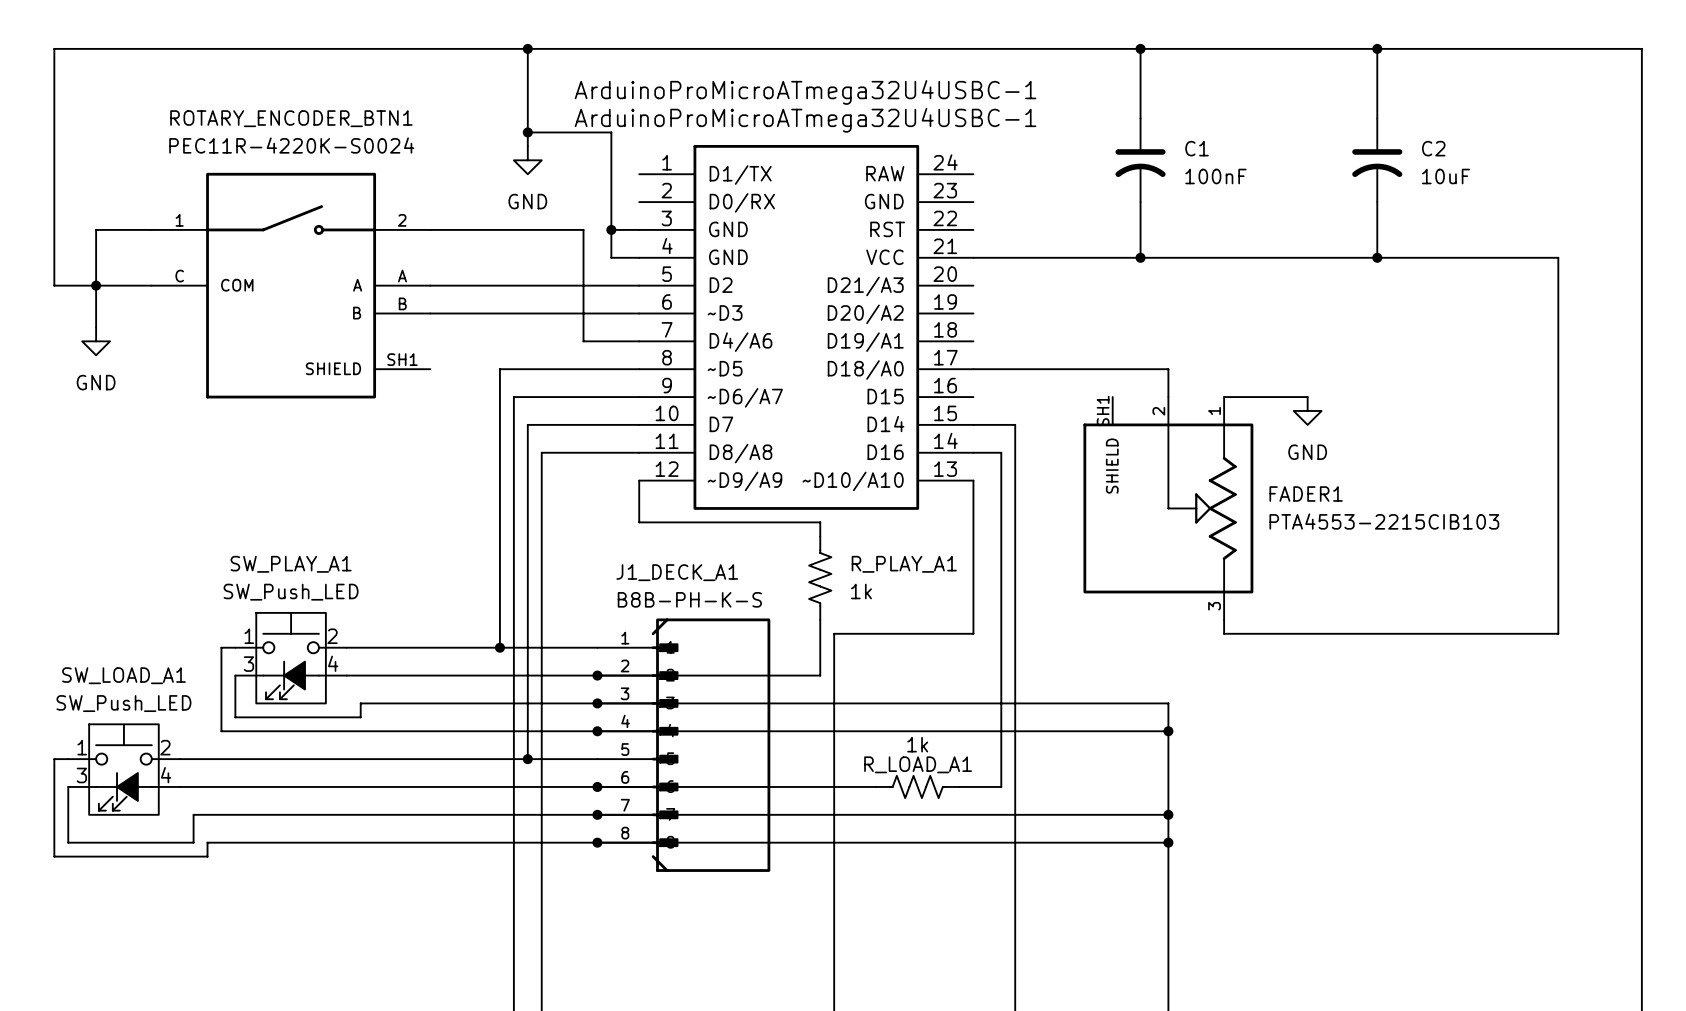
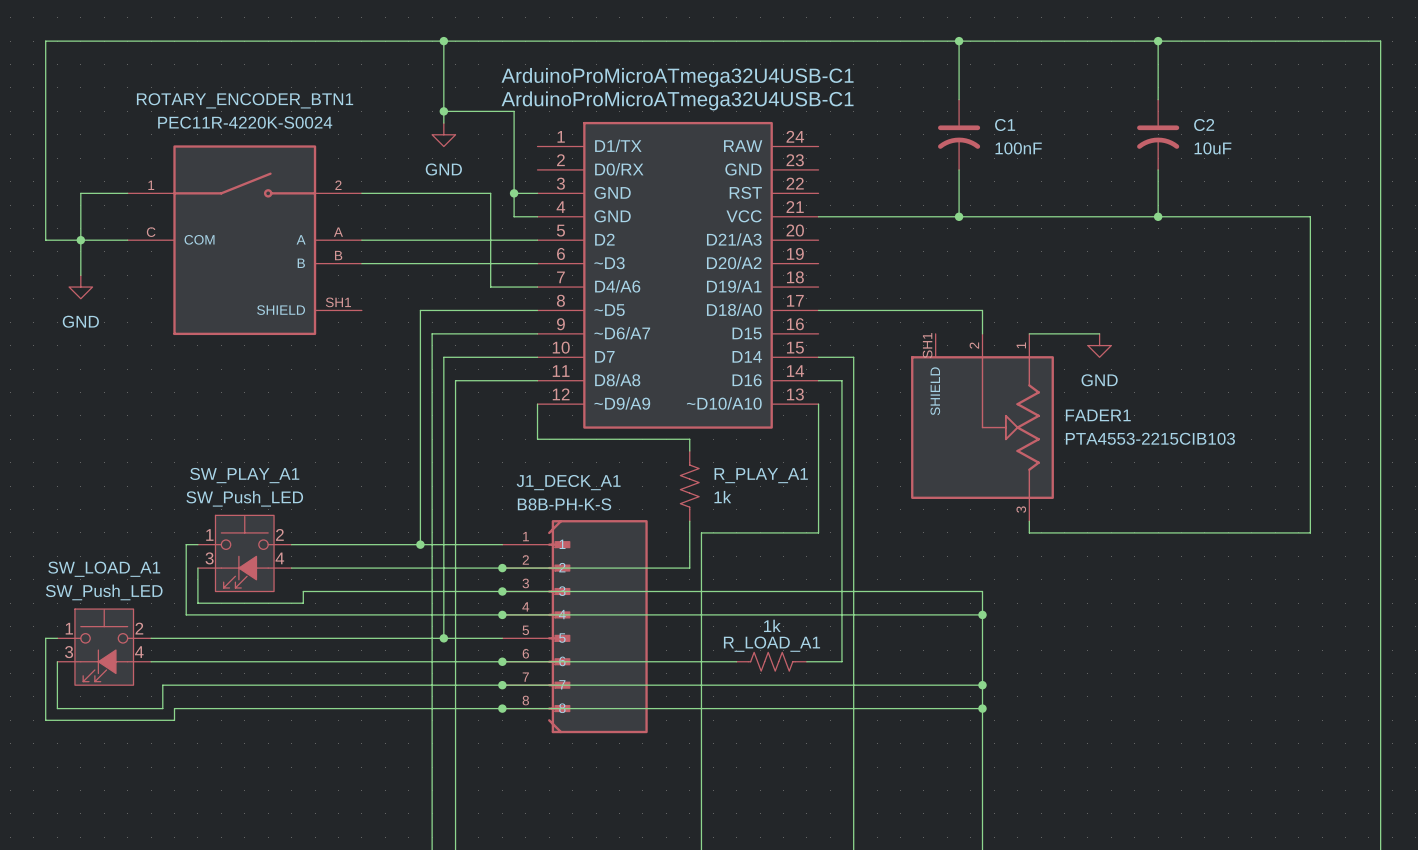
ArduinoProMicroATmega32U4USBC-1 name: ArduinoProMicroATmega32U4USBC-1 (805, 92) -> ArduinoProMicroATmega32U4USB-C1 (677, 77)
ArduinoProMicroATmega32U4USBC-1 value: ArduinoProMicroATmega32U4USBC-1 (805, 120) -> ArduinoProMicroATmega32U4USB-C1 (677, 100)

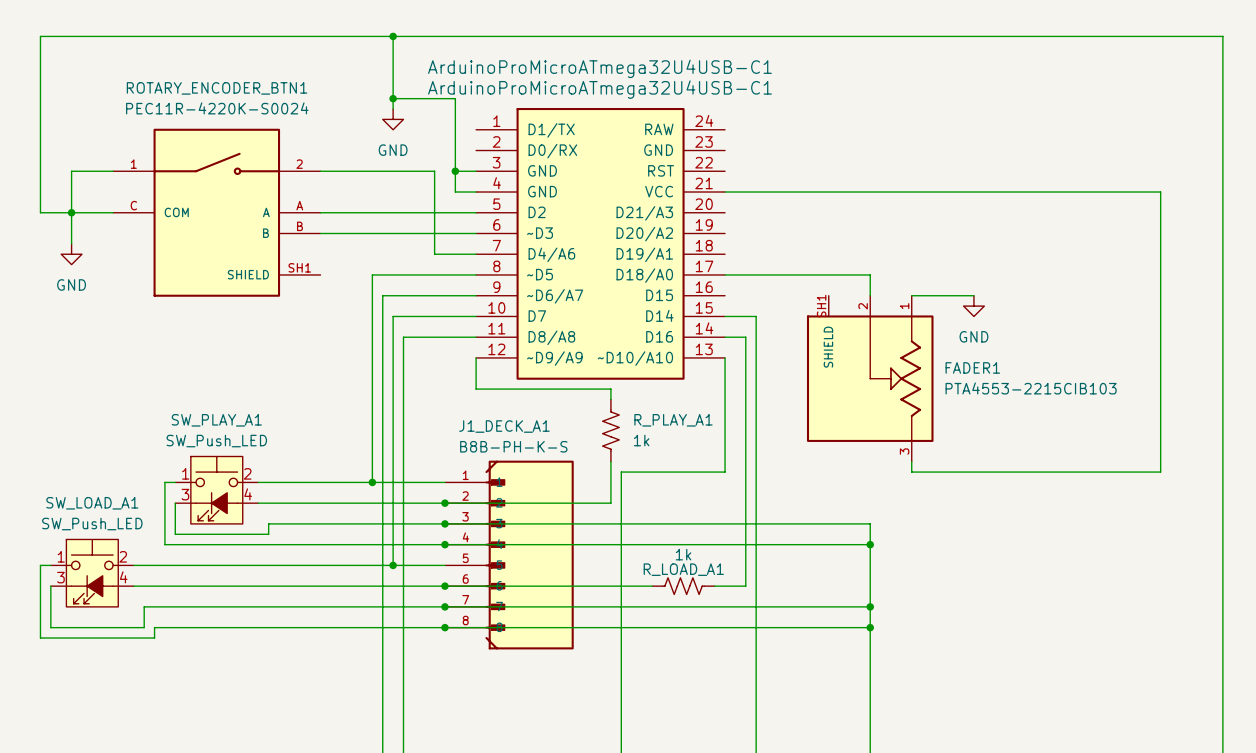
wire: (959, 41) (959, 99) -> none
junction: (959, 41) -> none
wire: (1158, 41) (1158, 99) -> none
junction: (1158, 41) -> none
C1: 100nF (959, 134) -> none
C2: 10uF (1158, 134) -> none
wire: (959, 169) (959, 216) -> none
wire: (1158, 169) (1158, 216) -> none
junction: (959, 216) -> none
junction: (1158, 216) -> none

